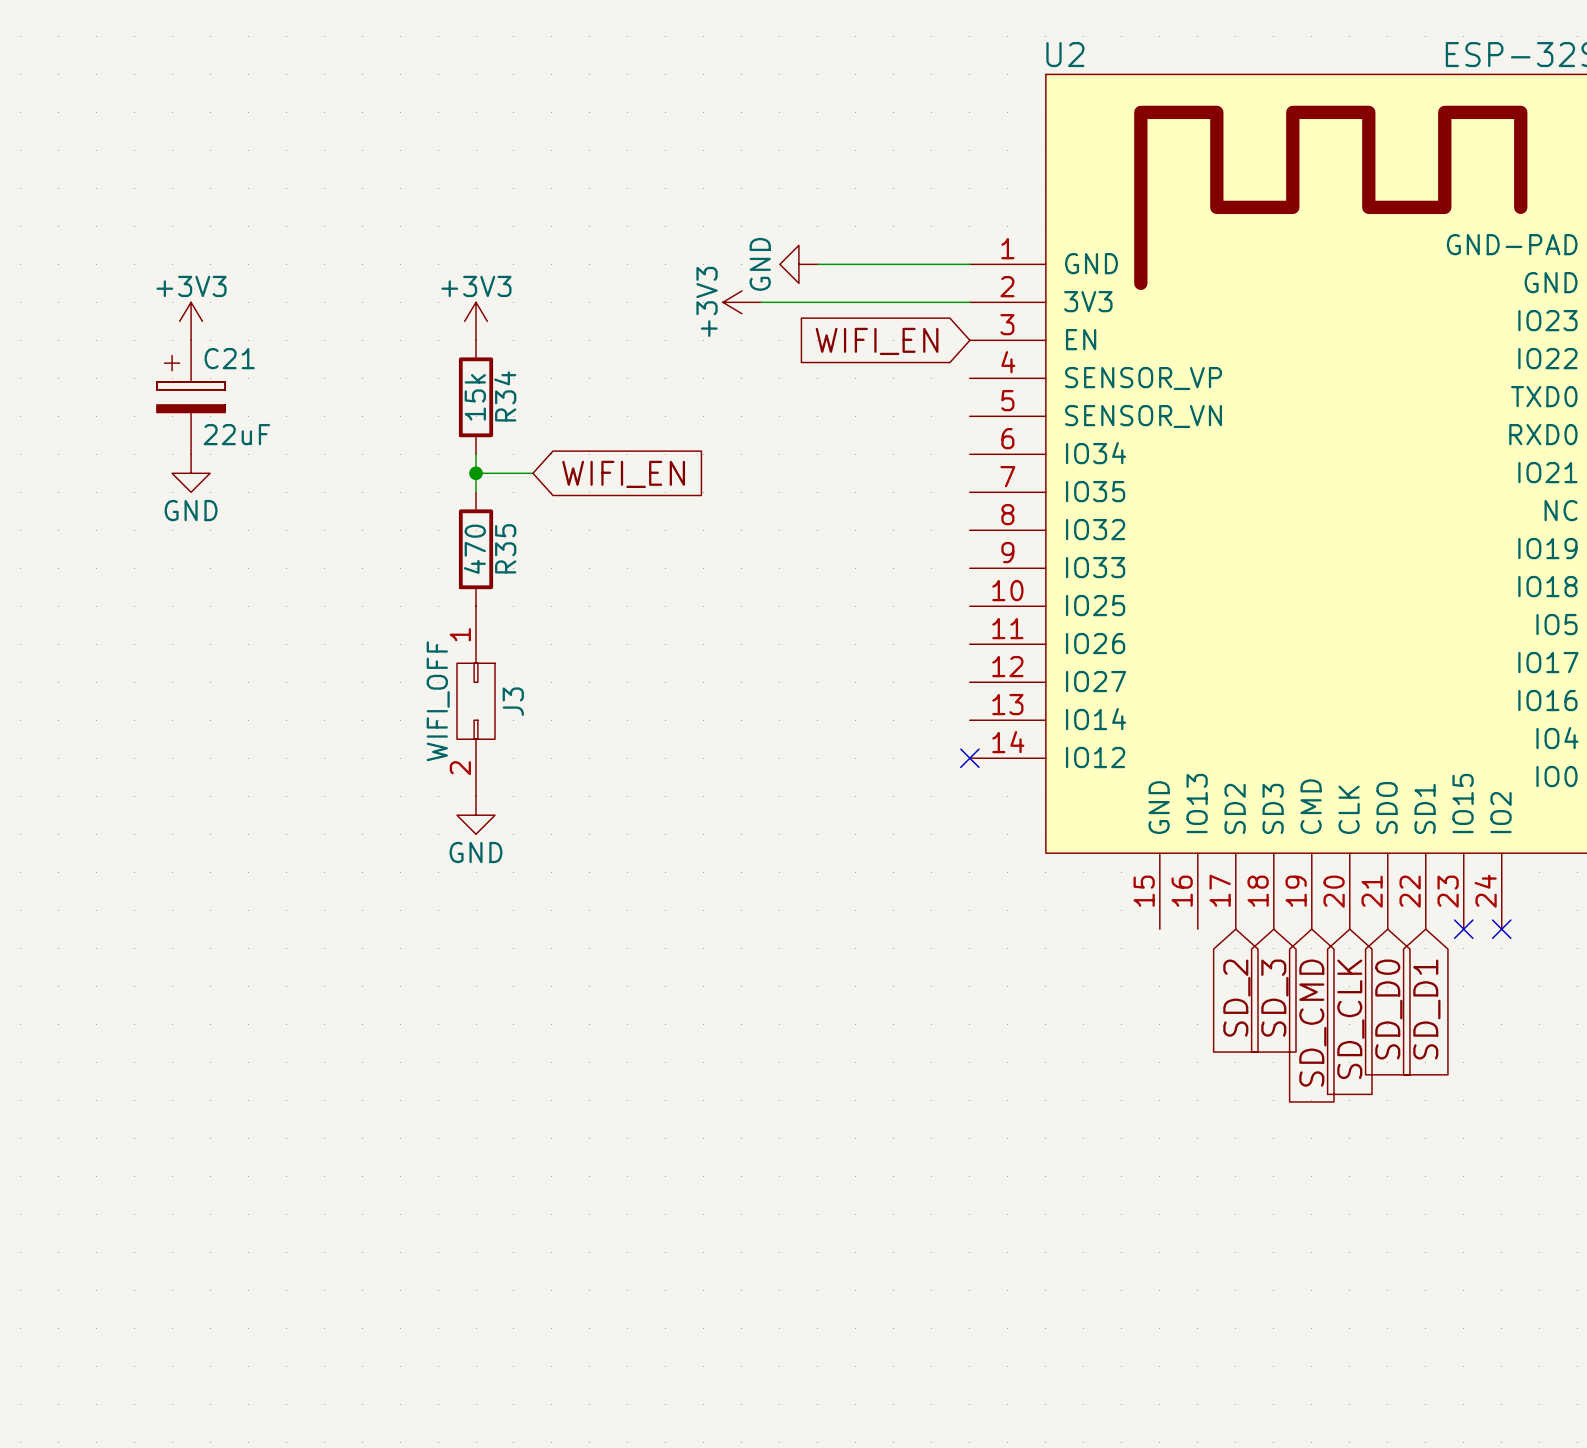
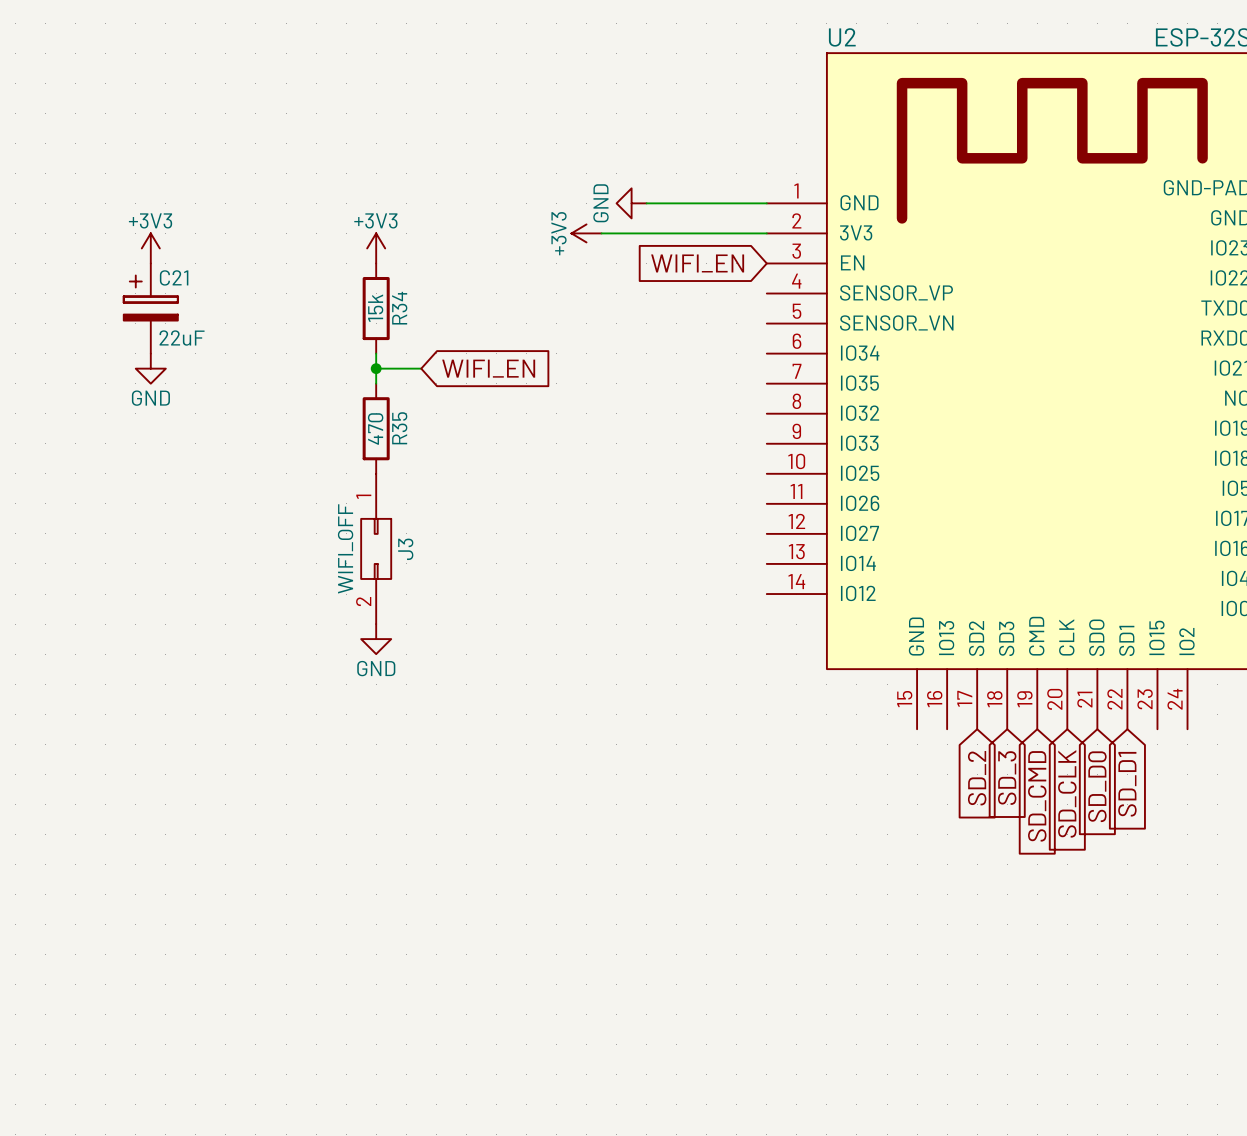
no-connect mark: (969, 758) -> none
no-connect mark: (1463, 929) -> none
no-connect mark: (1501, 929) -> none

